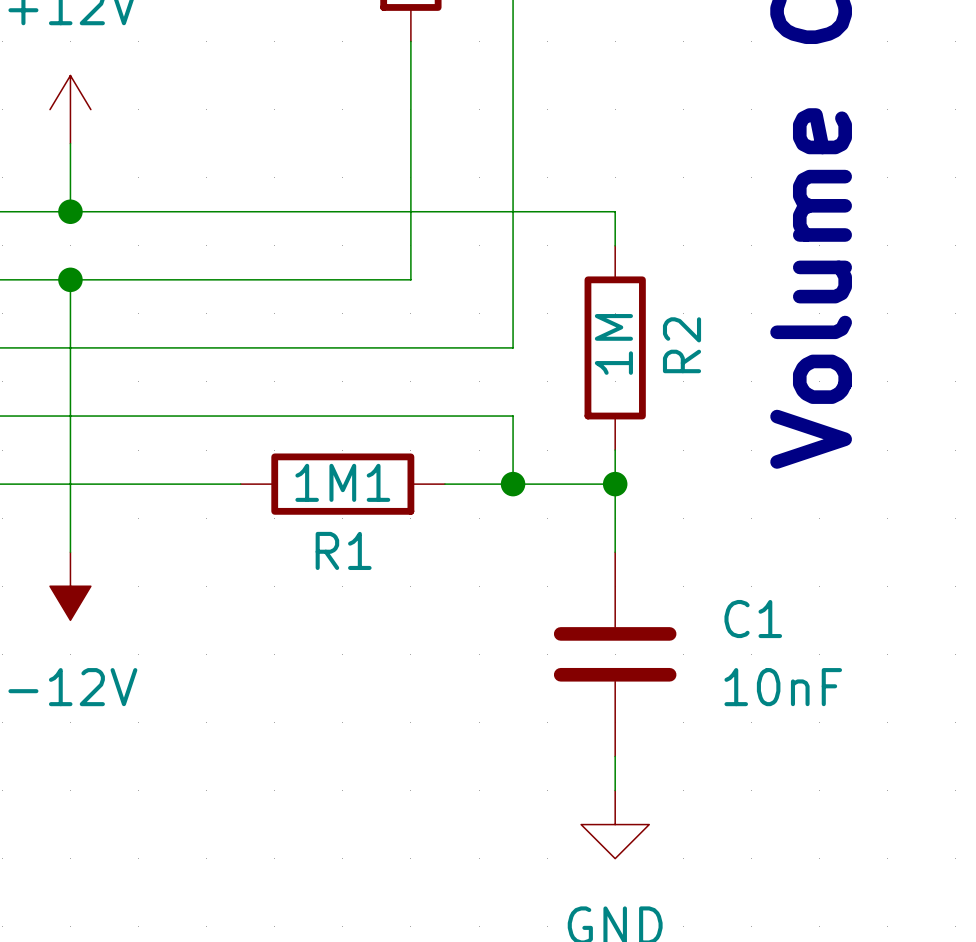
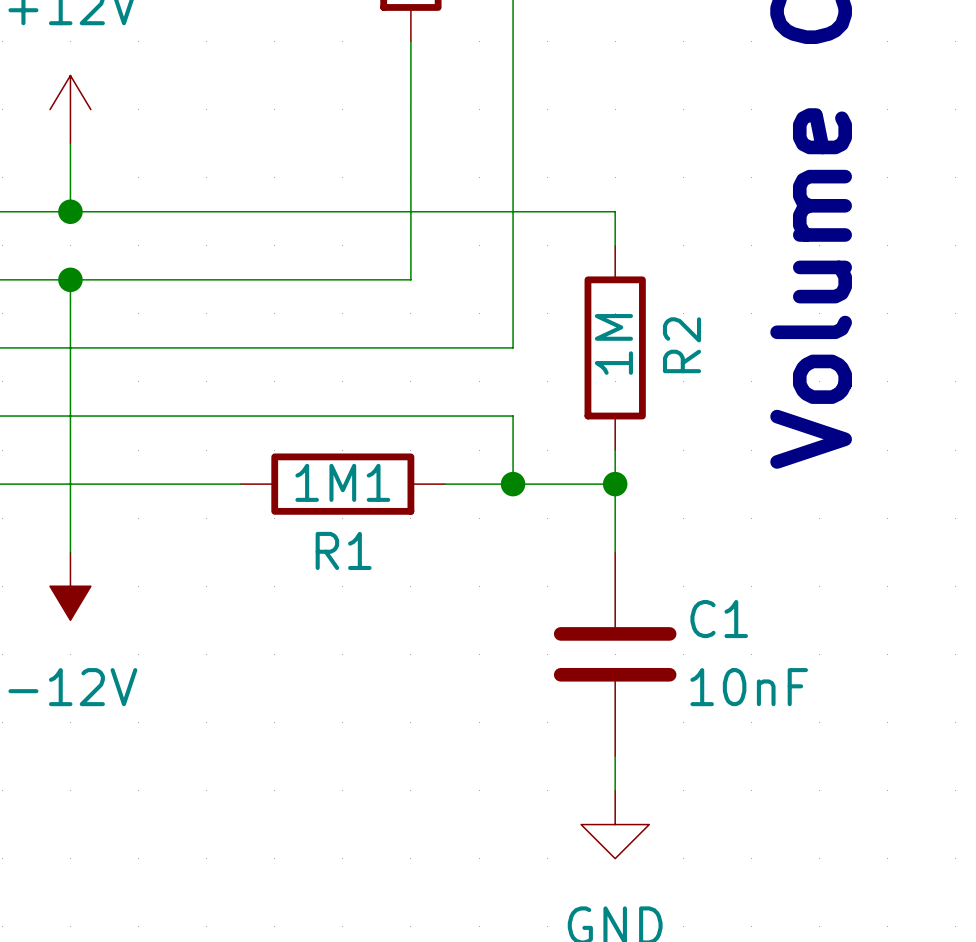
C1 name position: C1 (753, 619) -> C1 (719, 619)
C1 value position: 10nF (783, 687) -> 10nF (749, 687)

